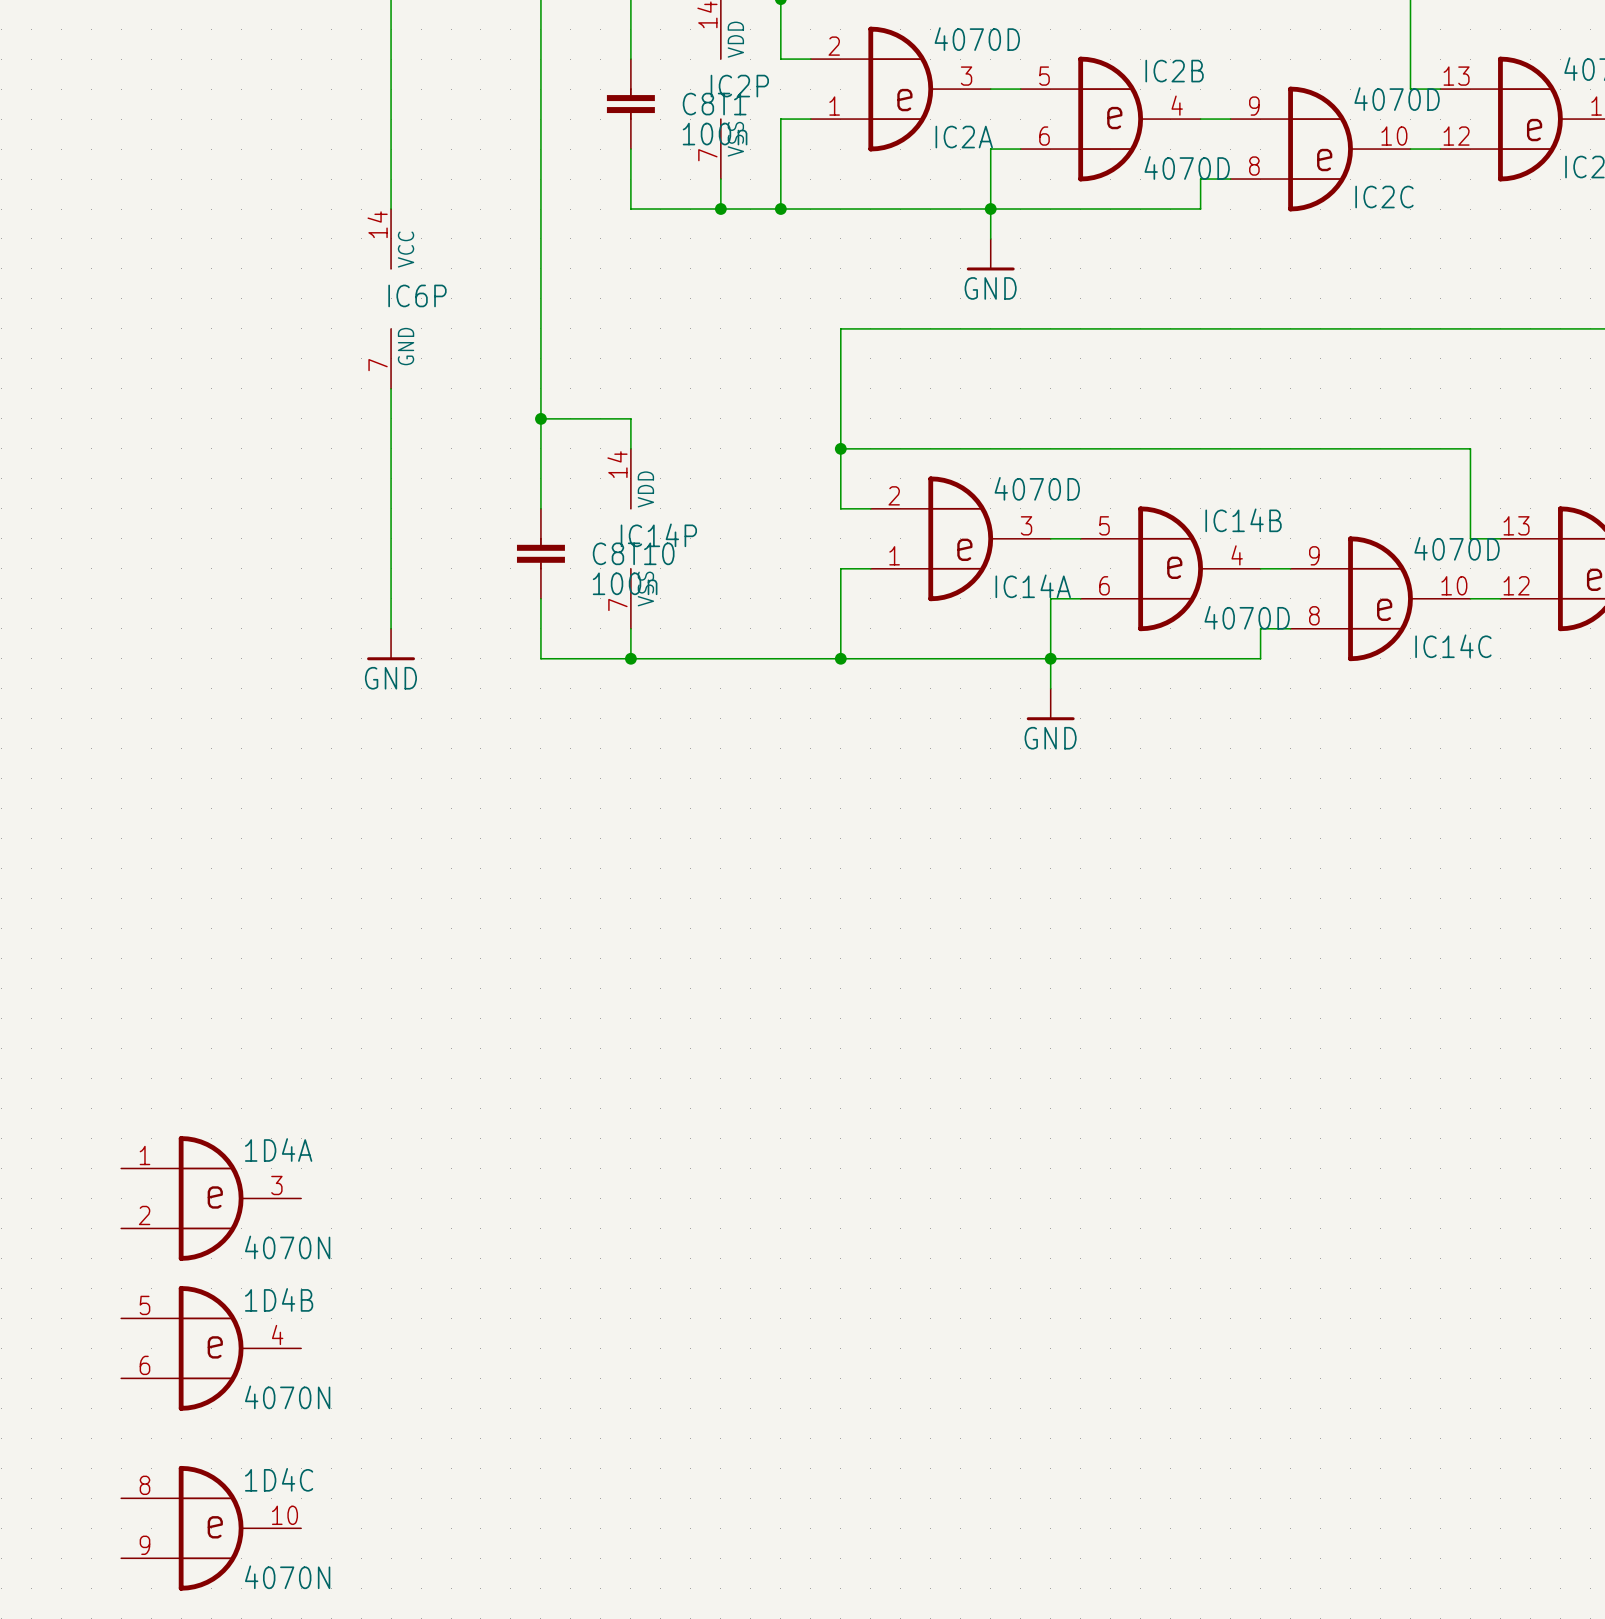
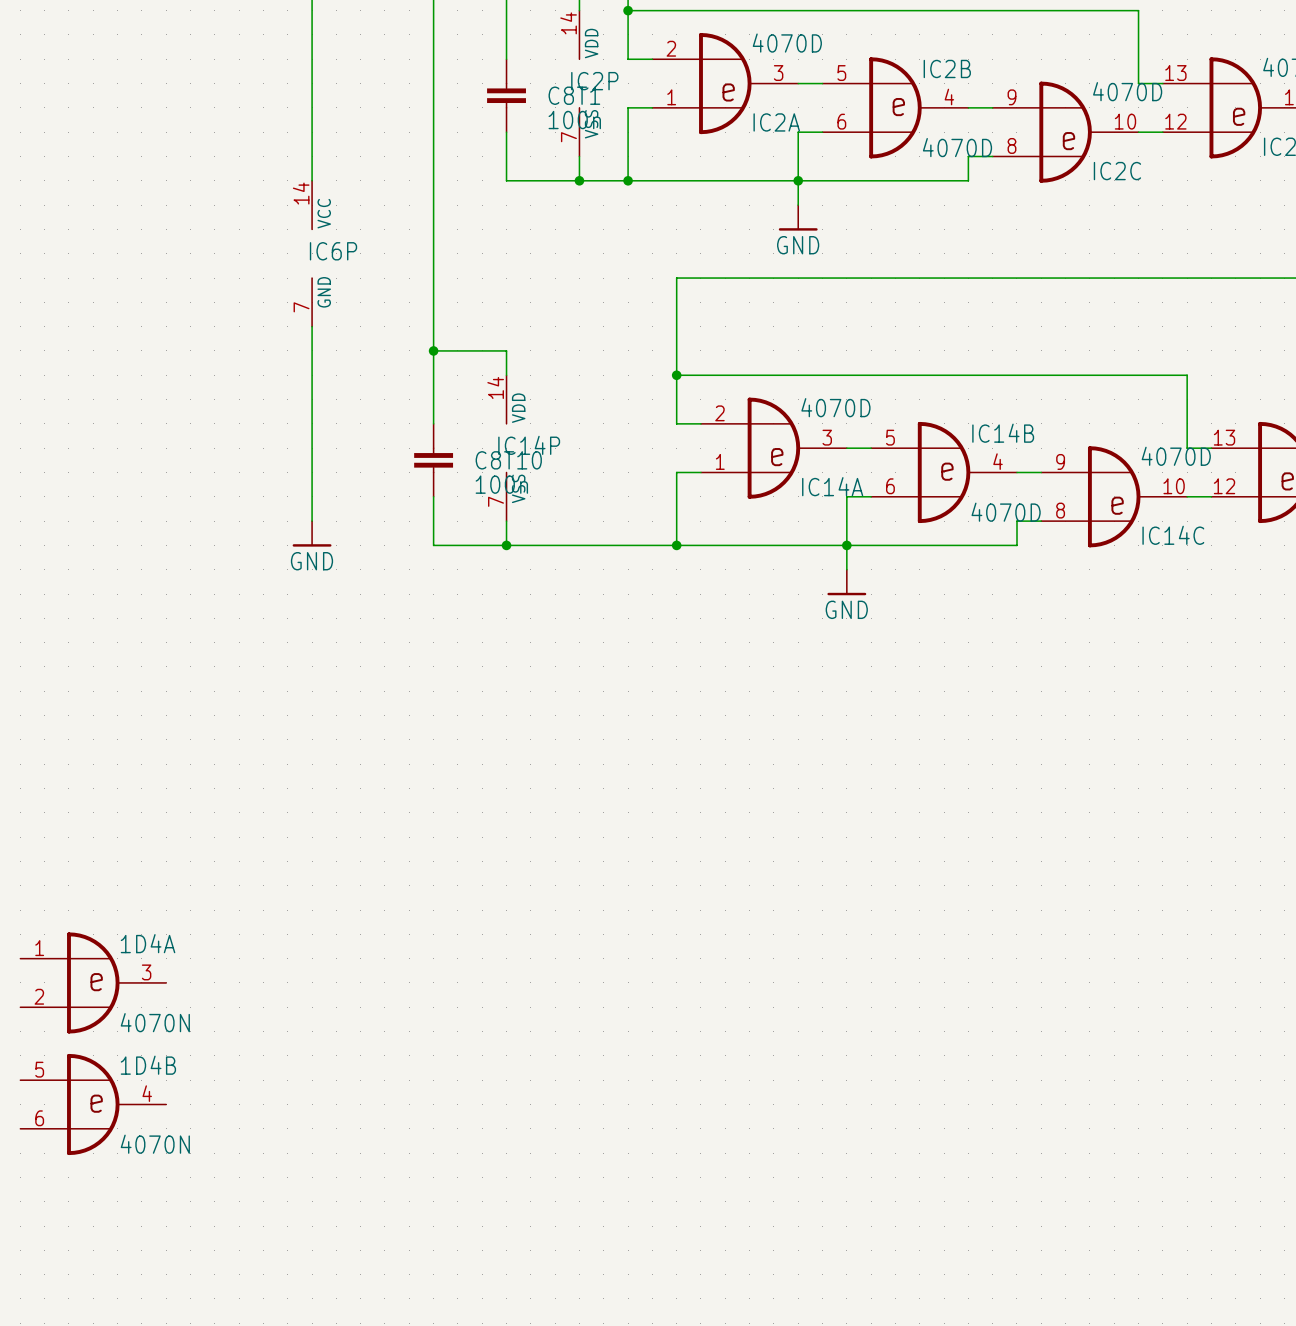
1D4A position: (211, 1198) -> (93, 982)
1D4B position: (211, 1348) -> (93, 1104)
1D4C: 4070N (211, 1528) -> none

